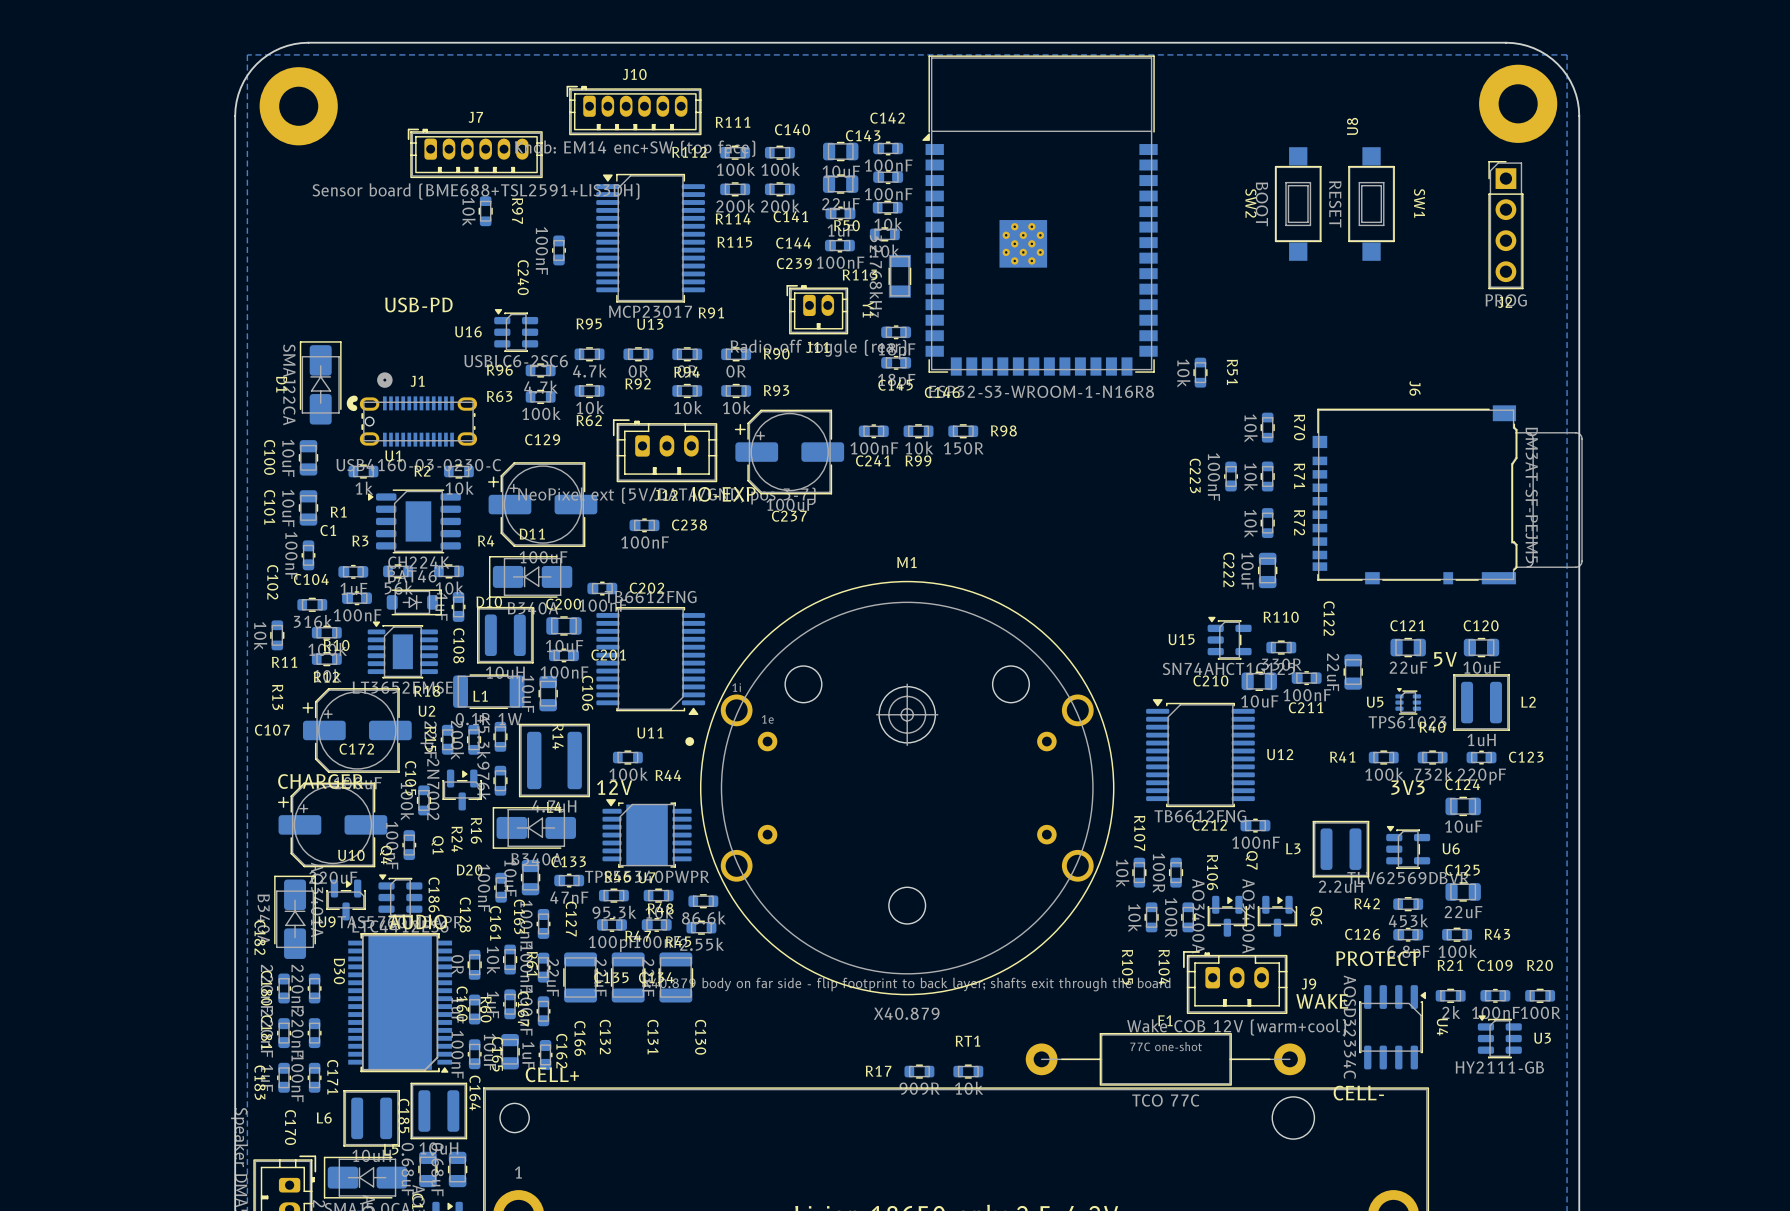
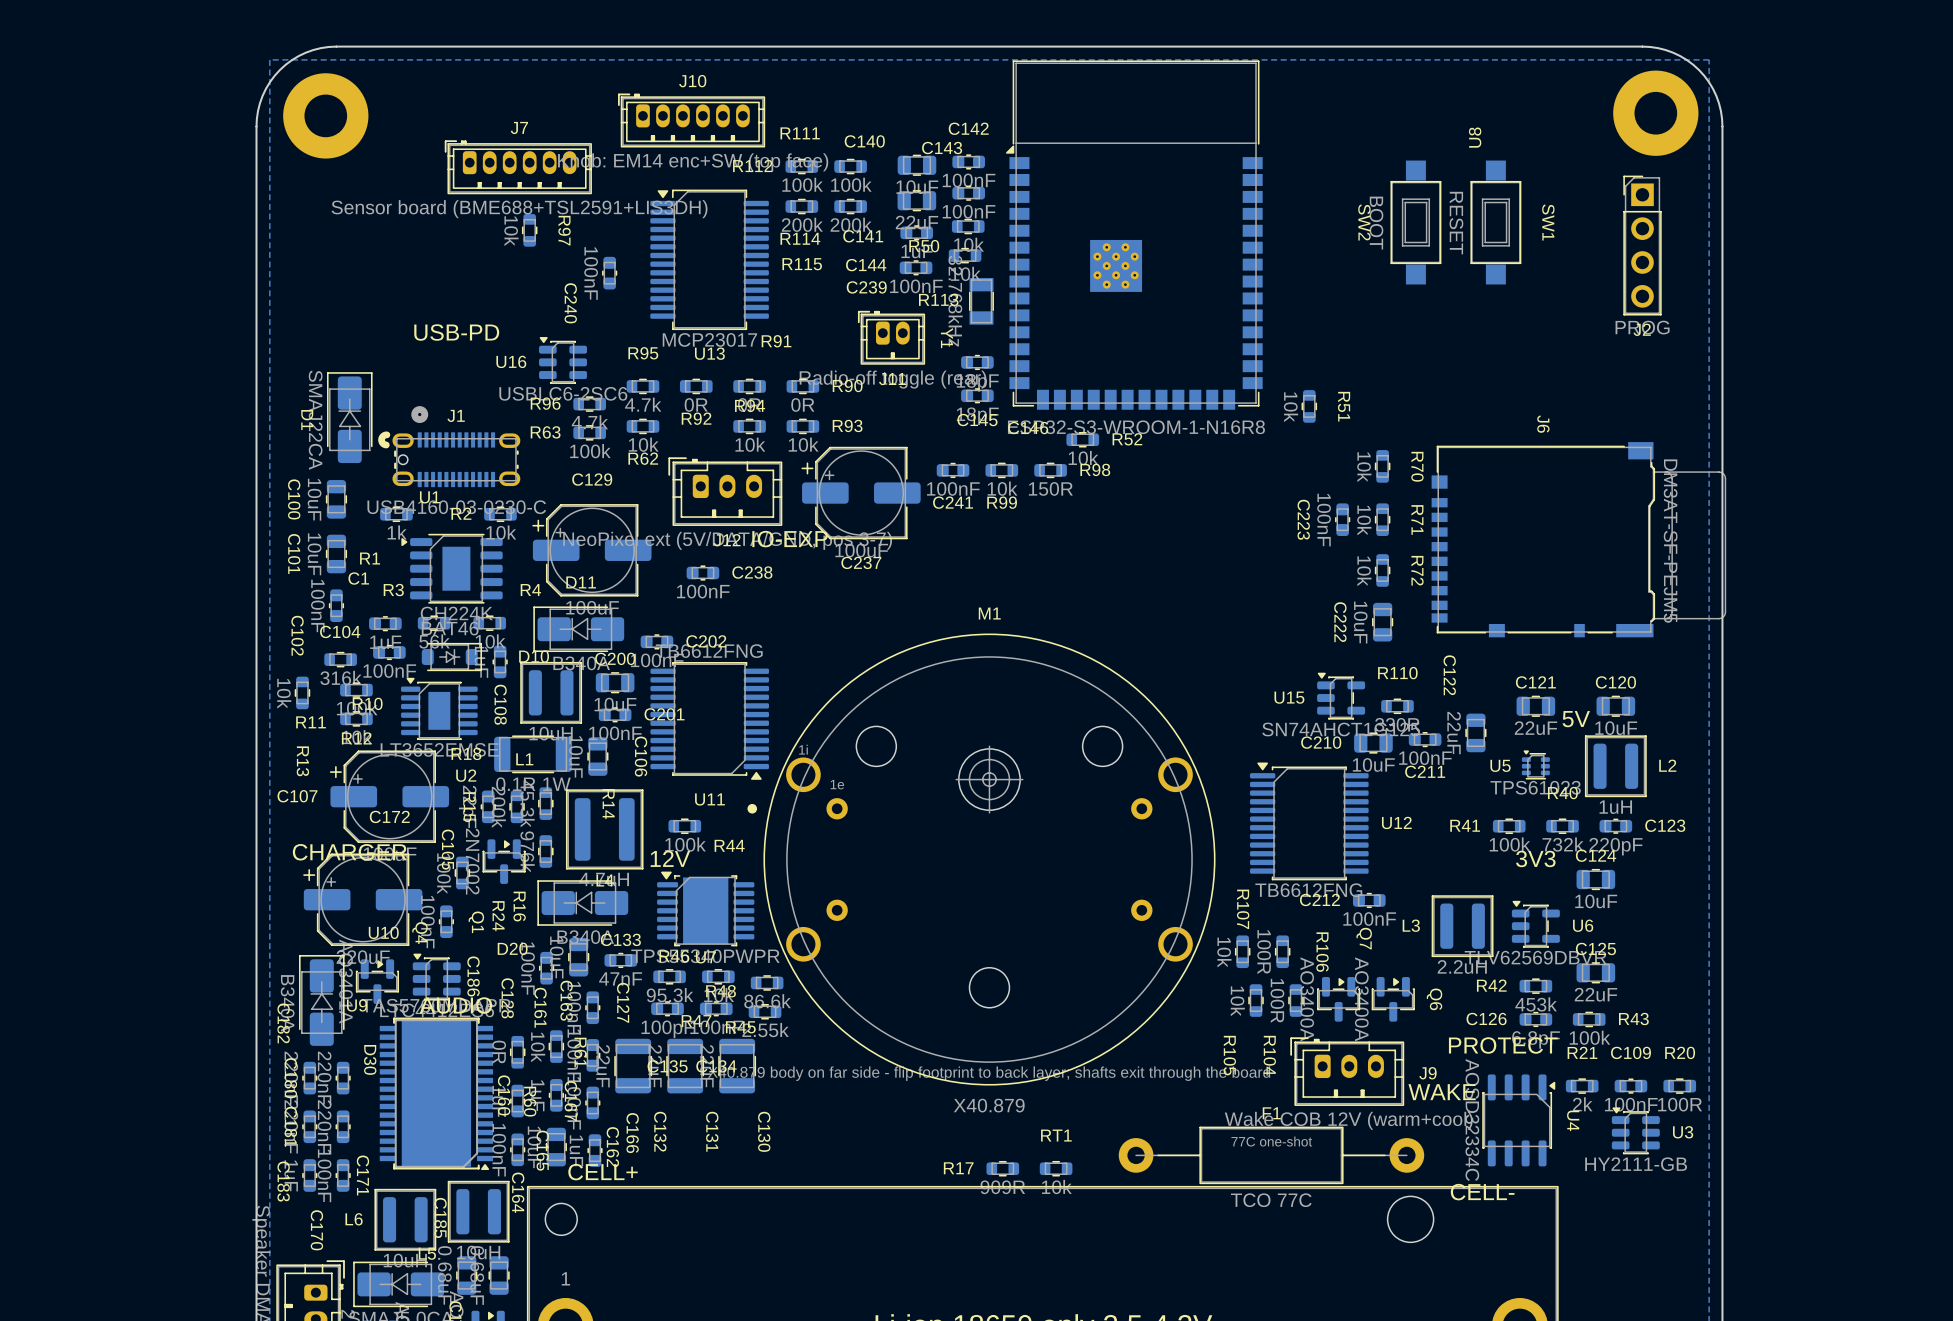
R52: none -> 10k (1082, 439)

